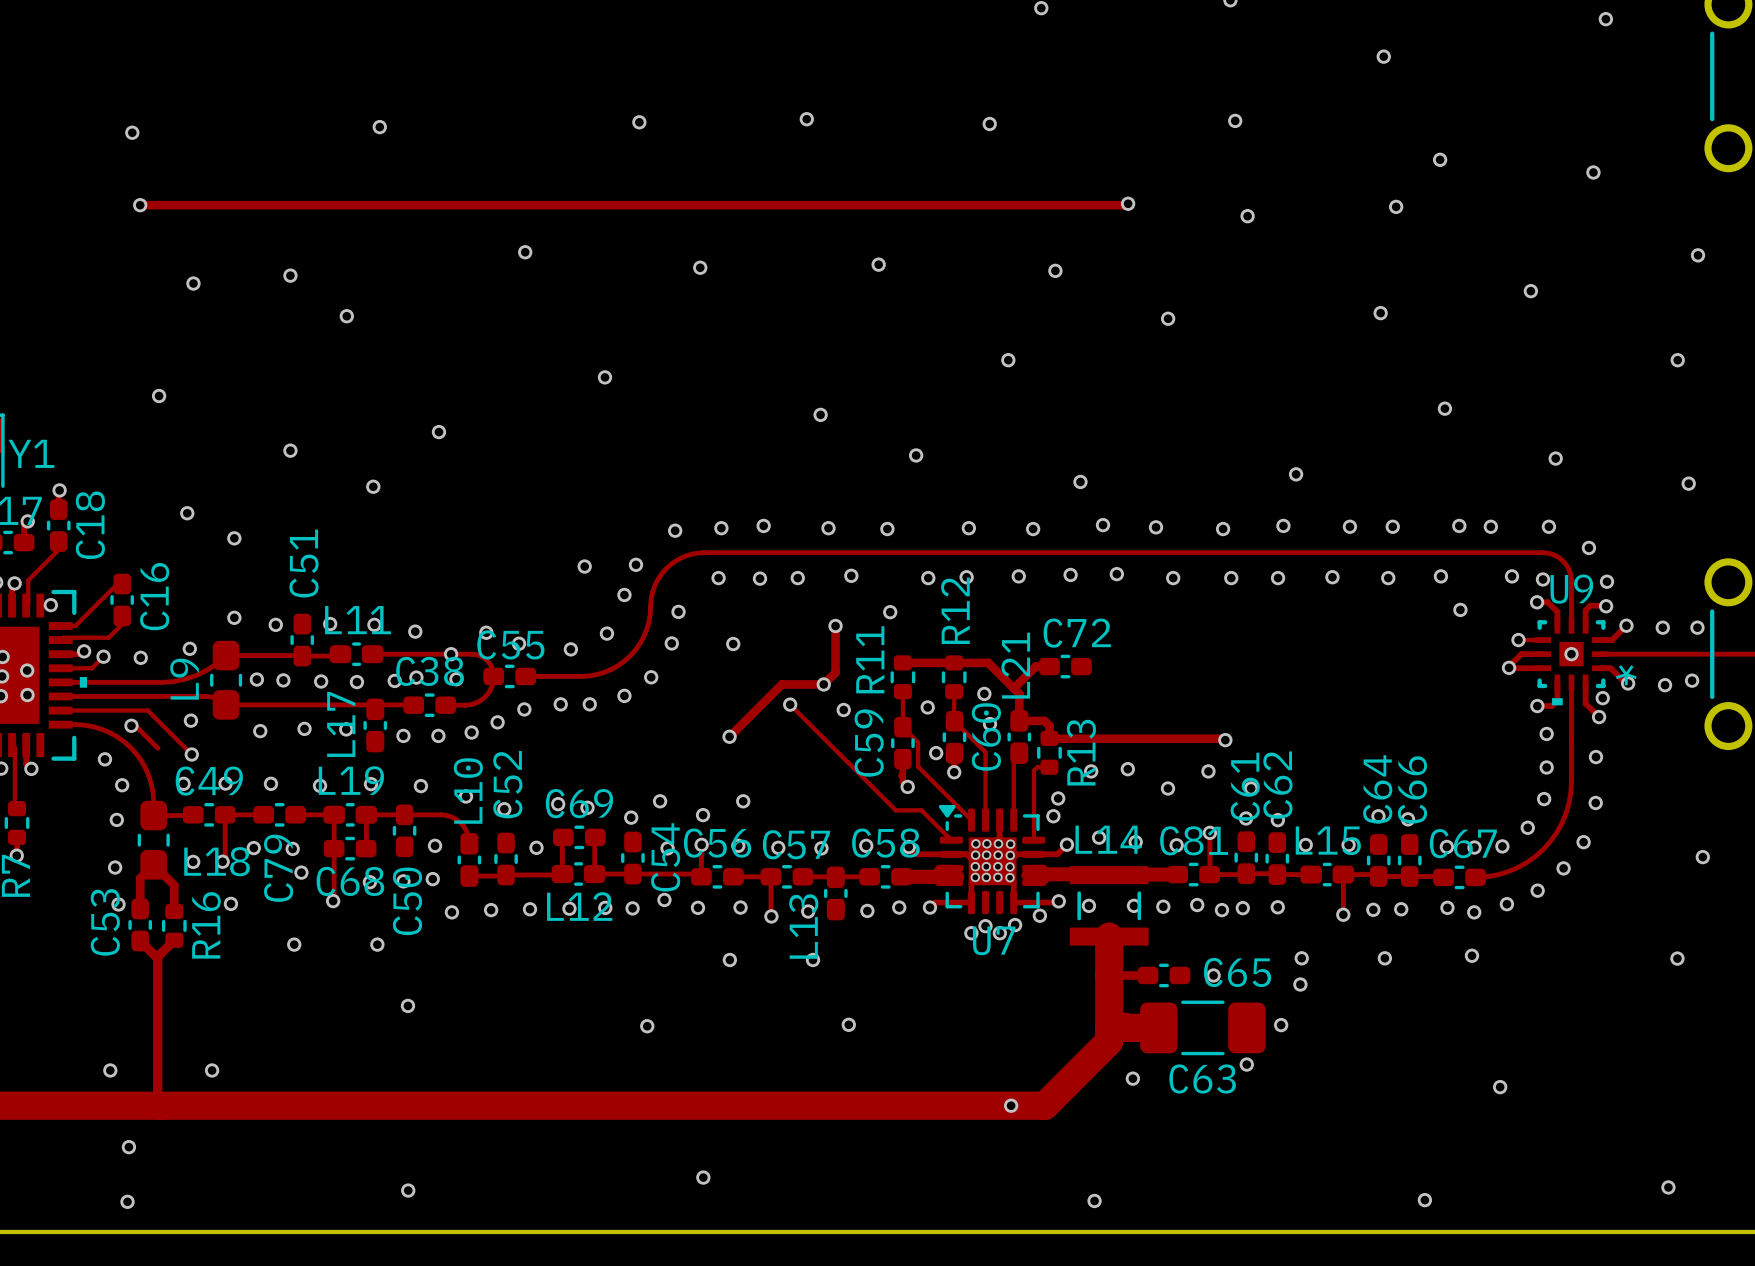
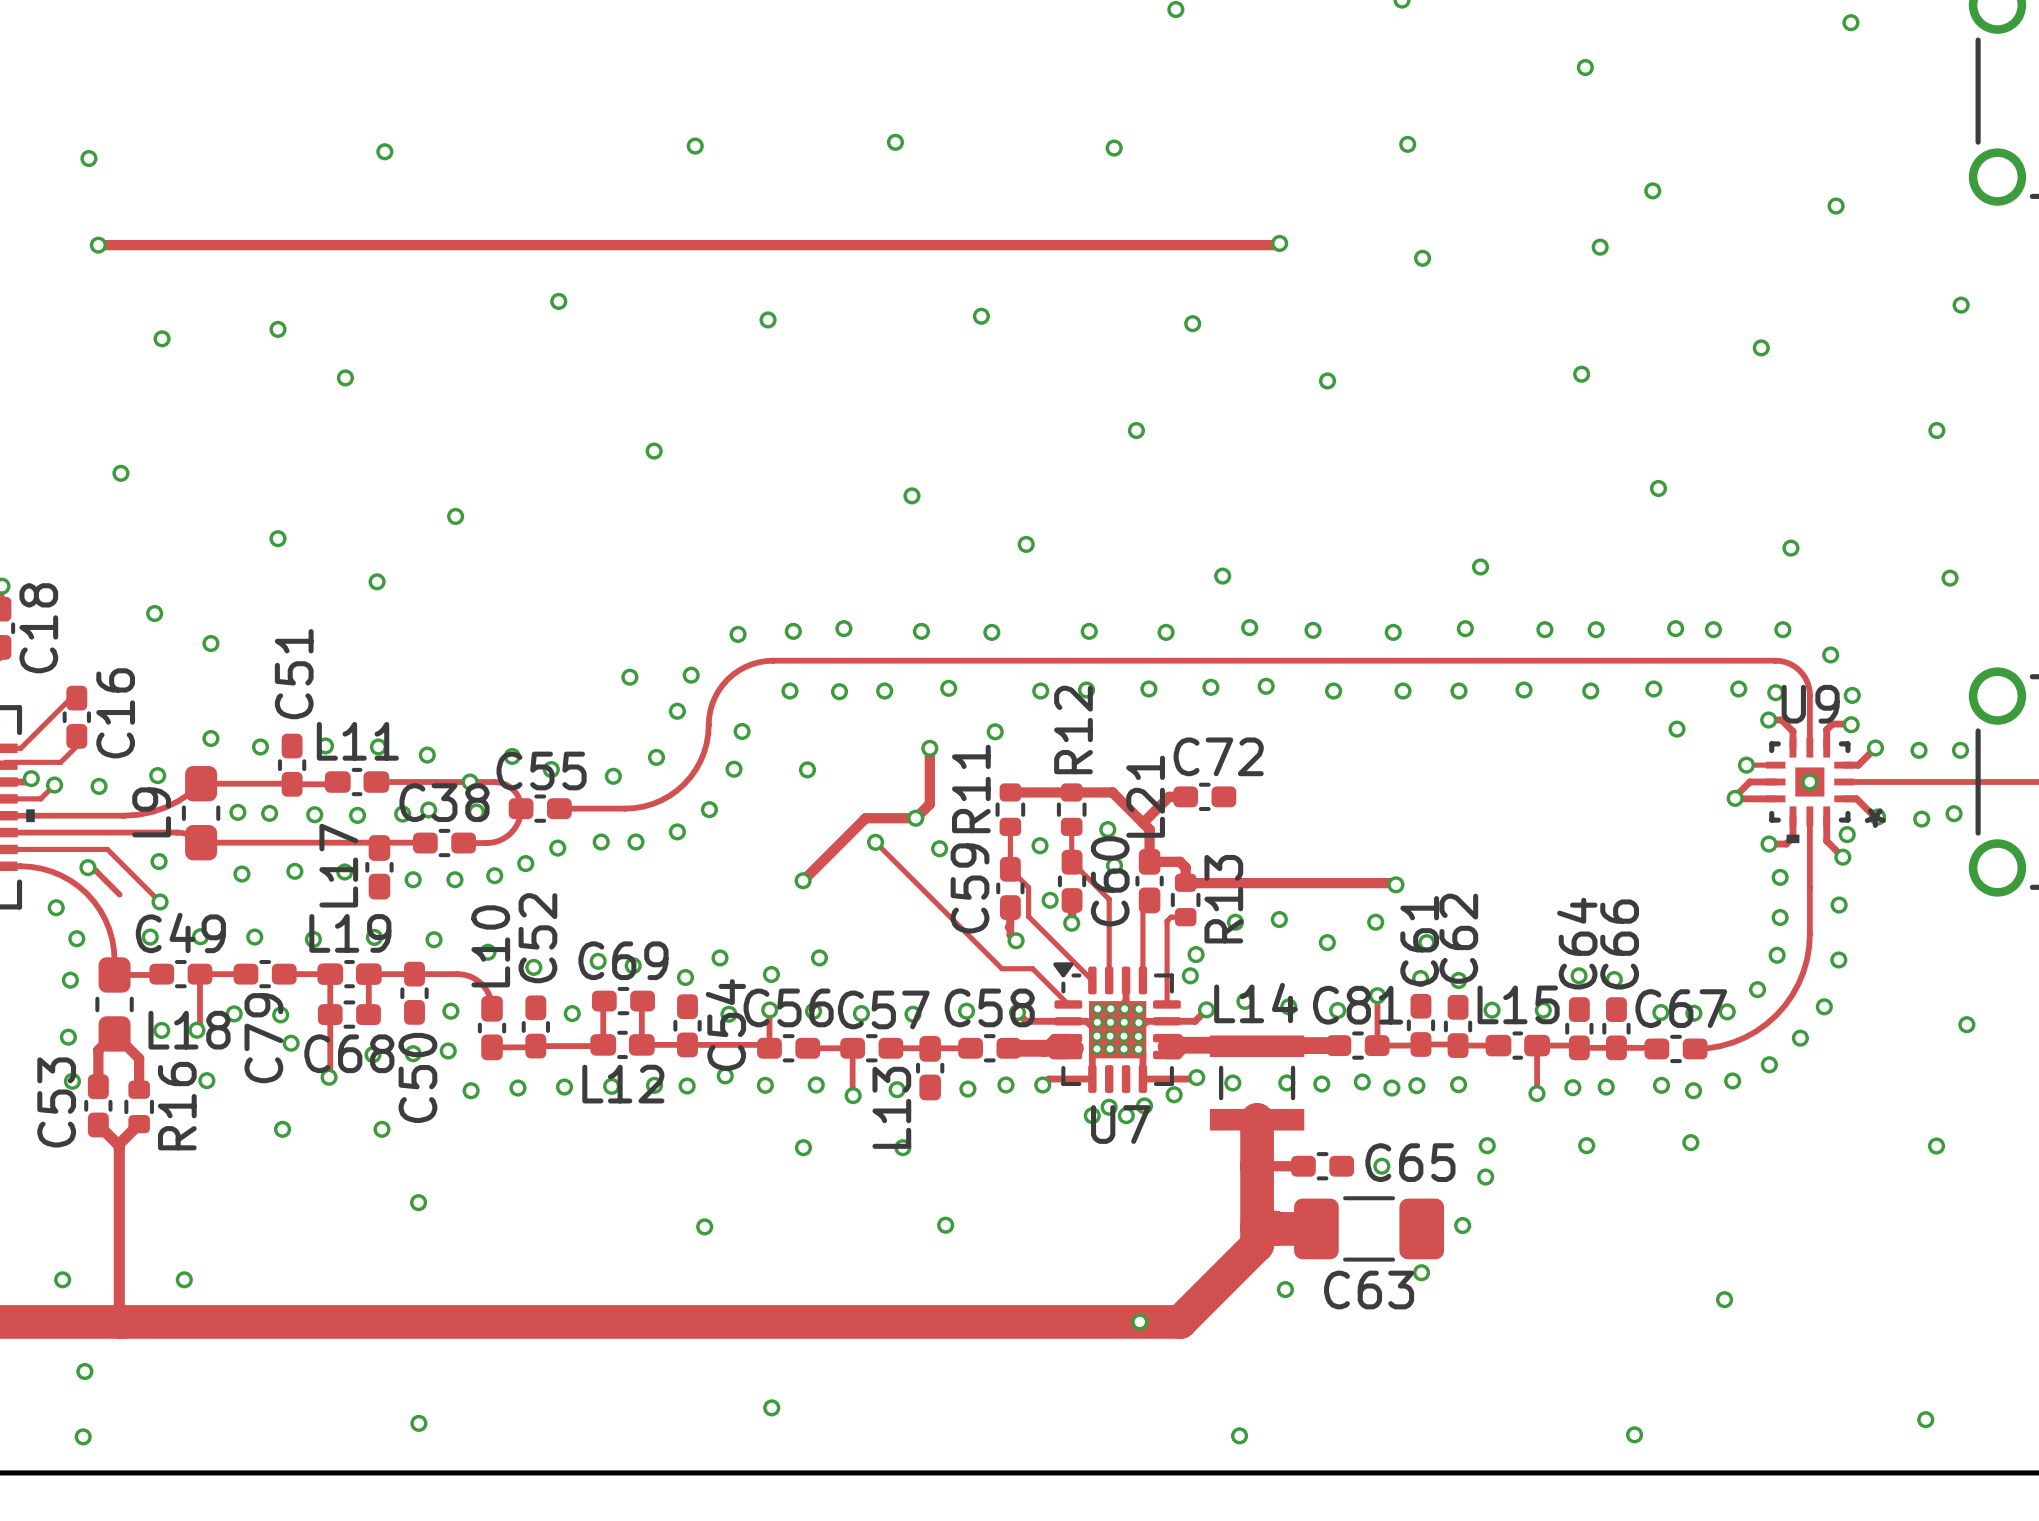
track: (1025, 875) (1027, 875) -> none

